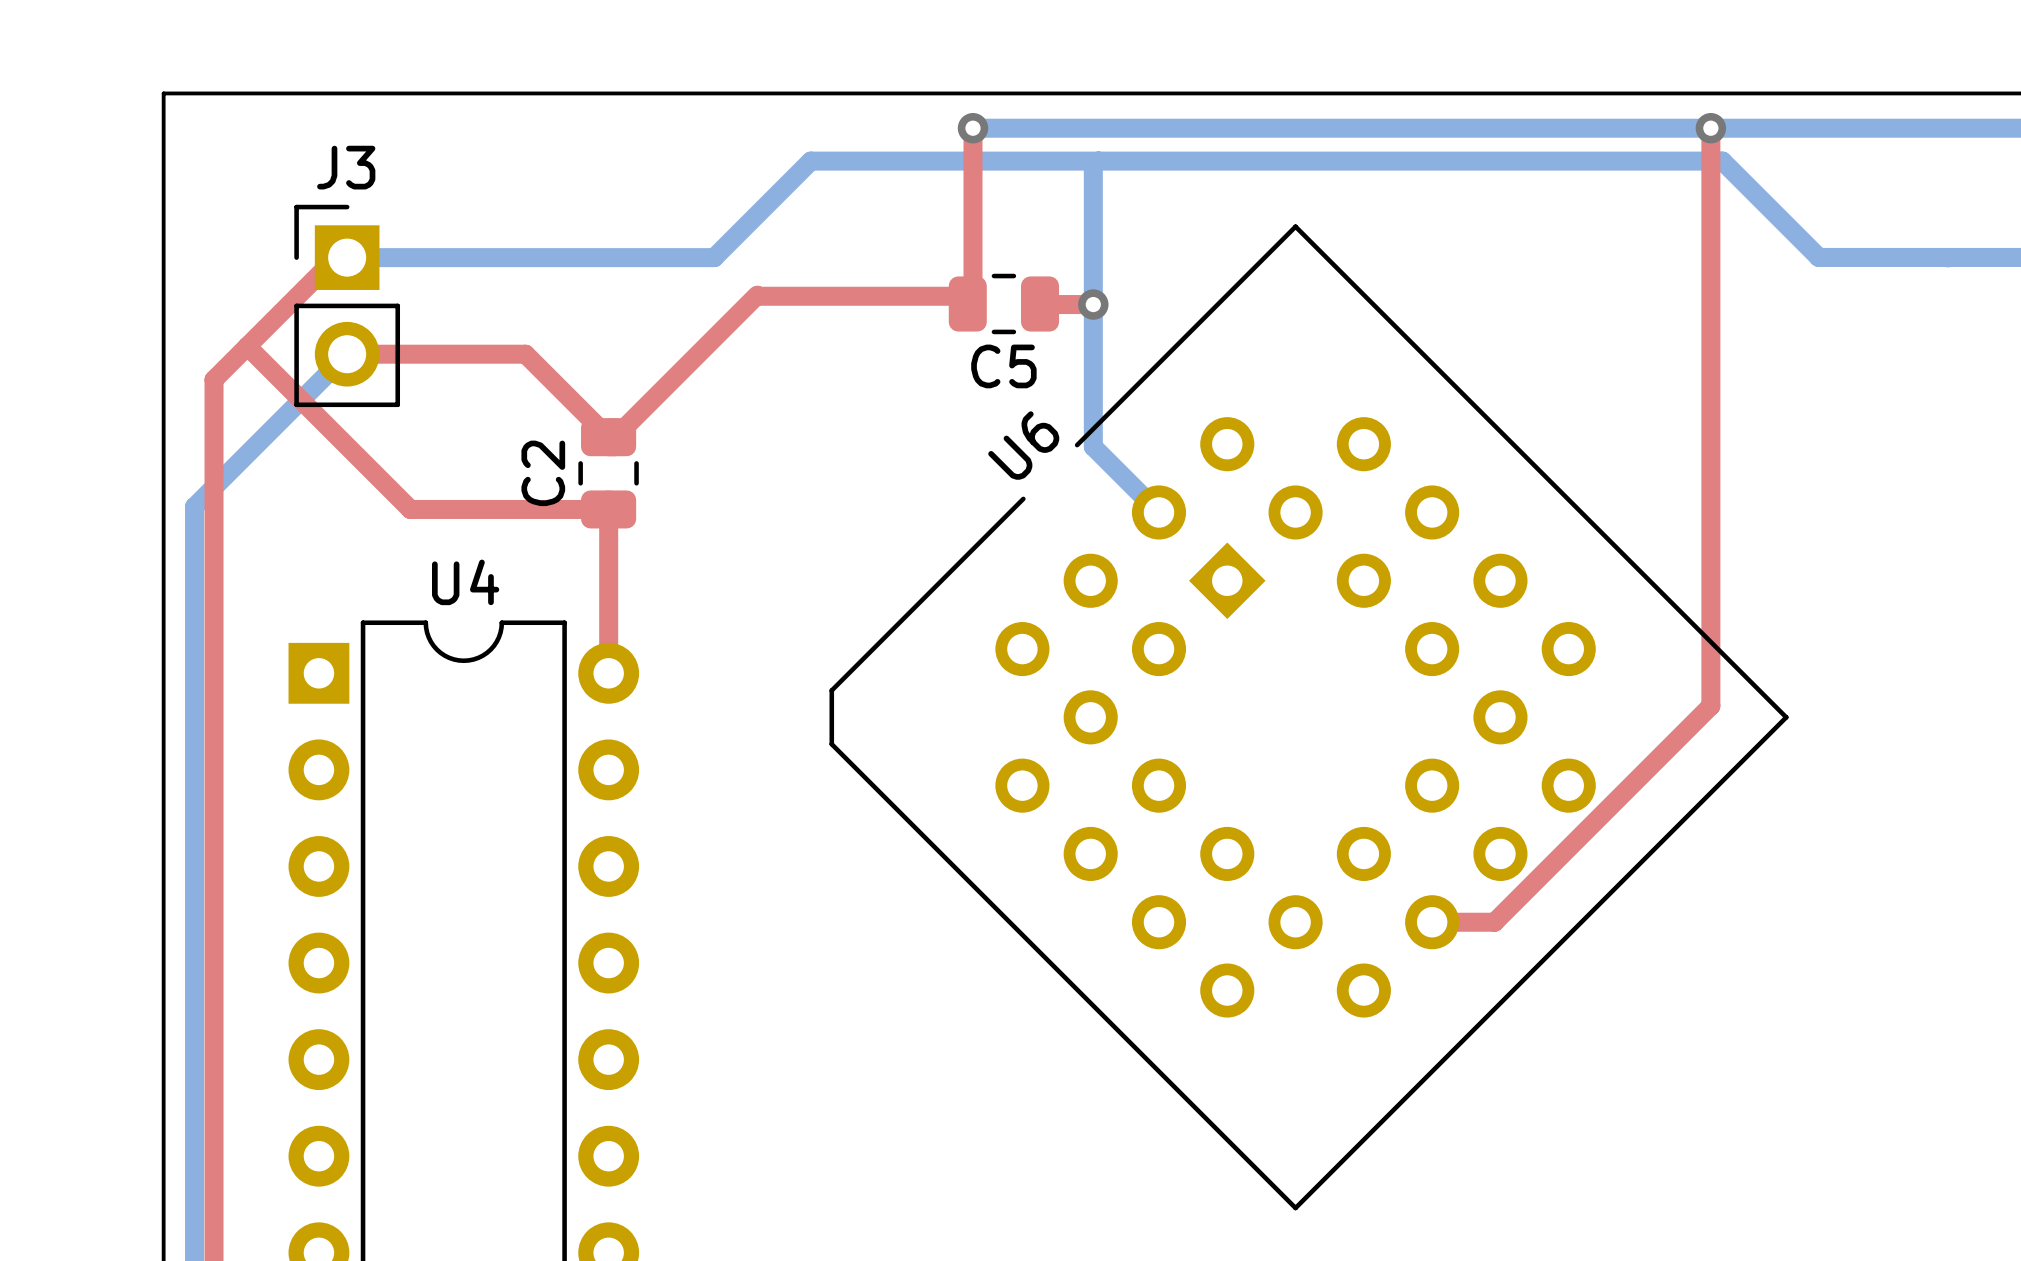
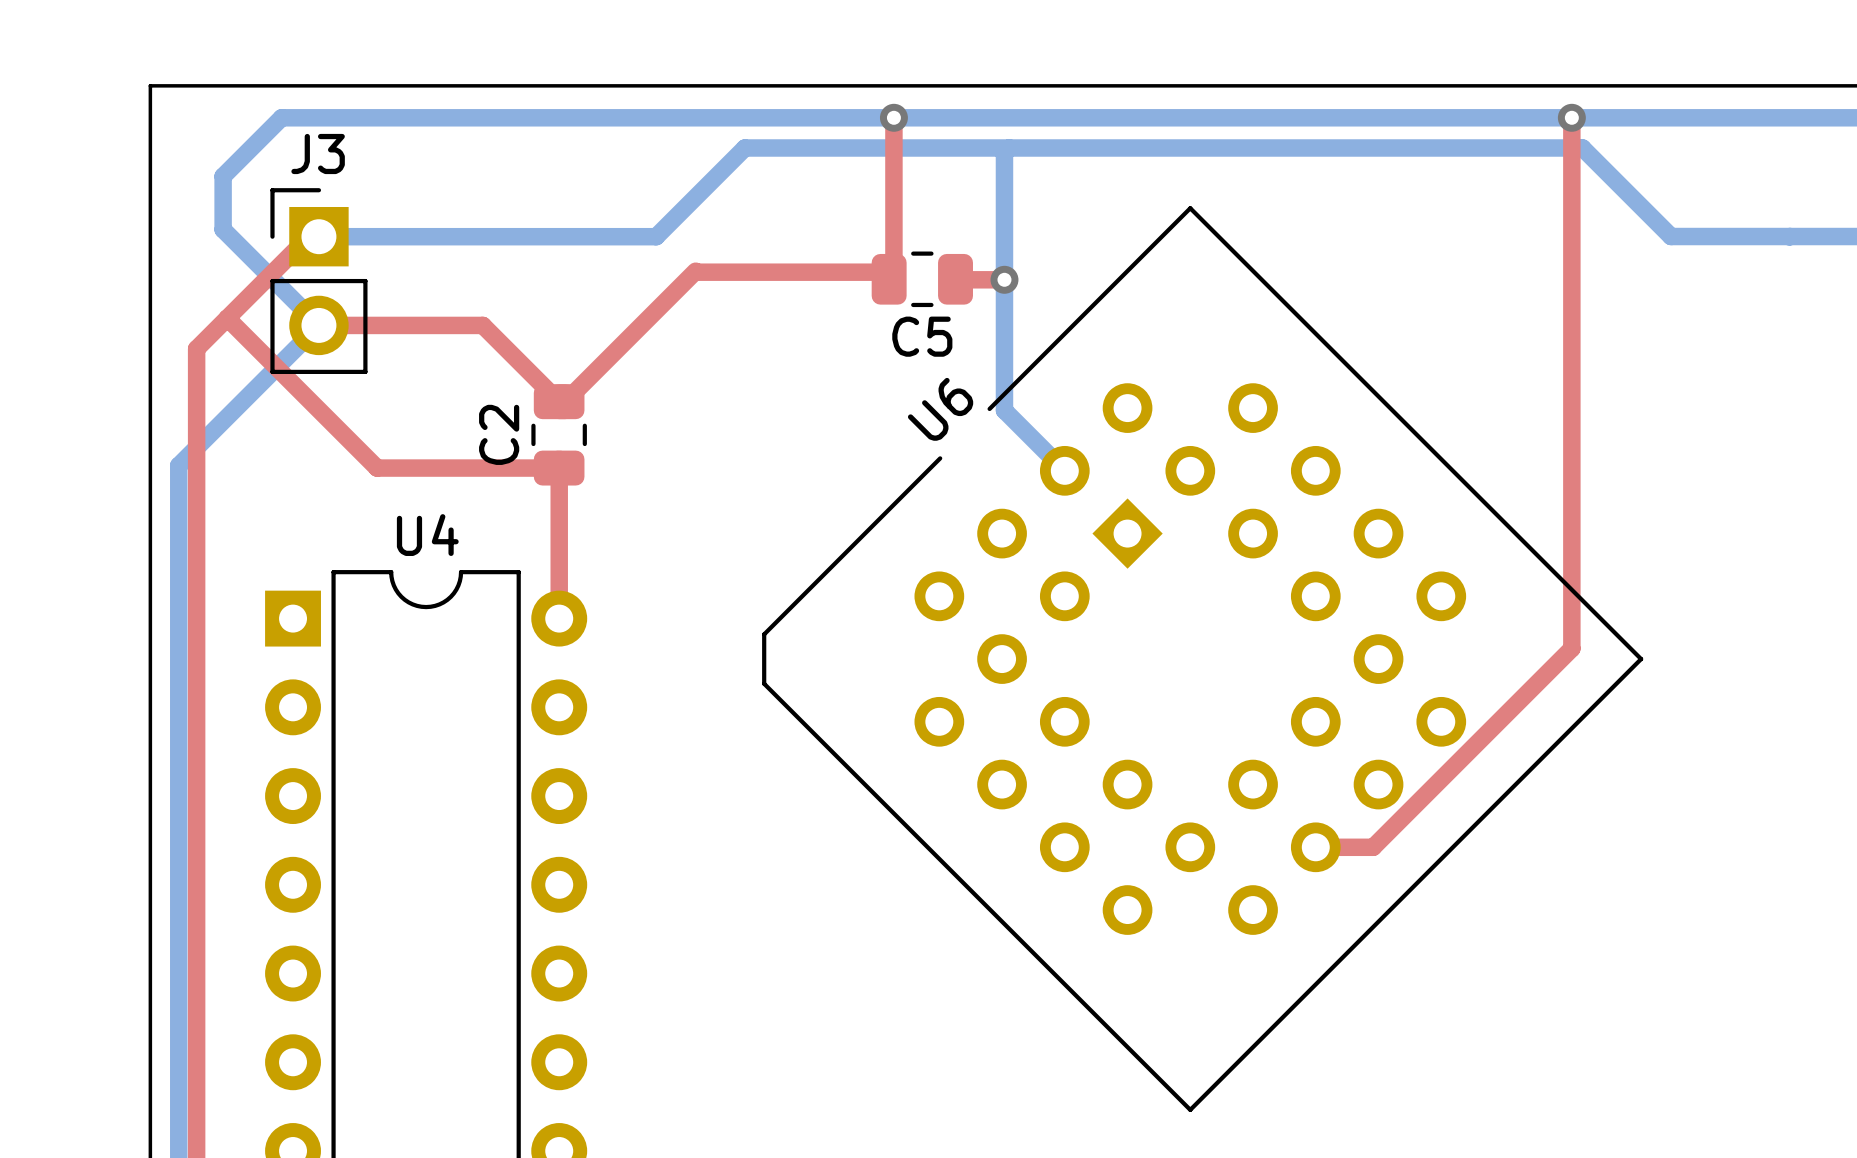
bottom track: none -> (893, 117) (281, 117) (223, 176) (223, 229) (318, 325)

